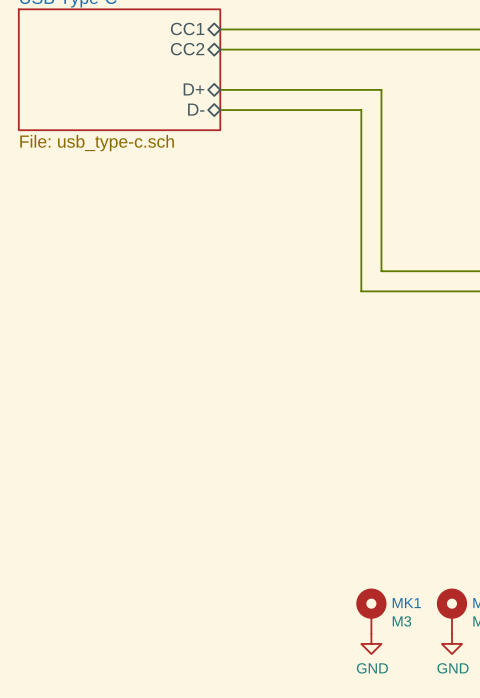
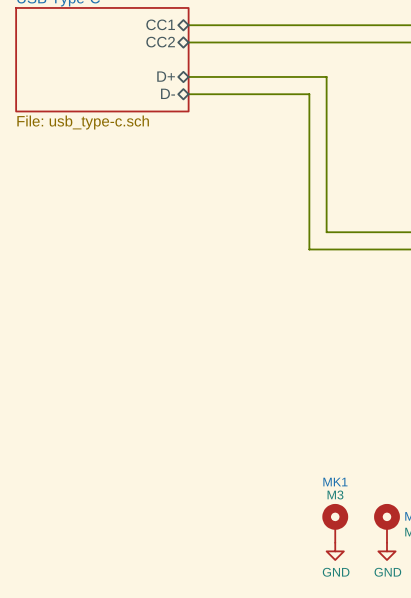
MK1 name position: MK1 (406, 603) -> MK1 (335, 482)
MK1 position: (371, 611) -> (335, 523)
MK1 value position: M3 (401, 621) -> M3 (335, 494)
power symbol position: GND (371, 643) -> GND (335, 551)

